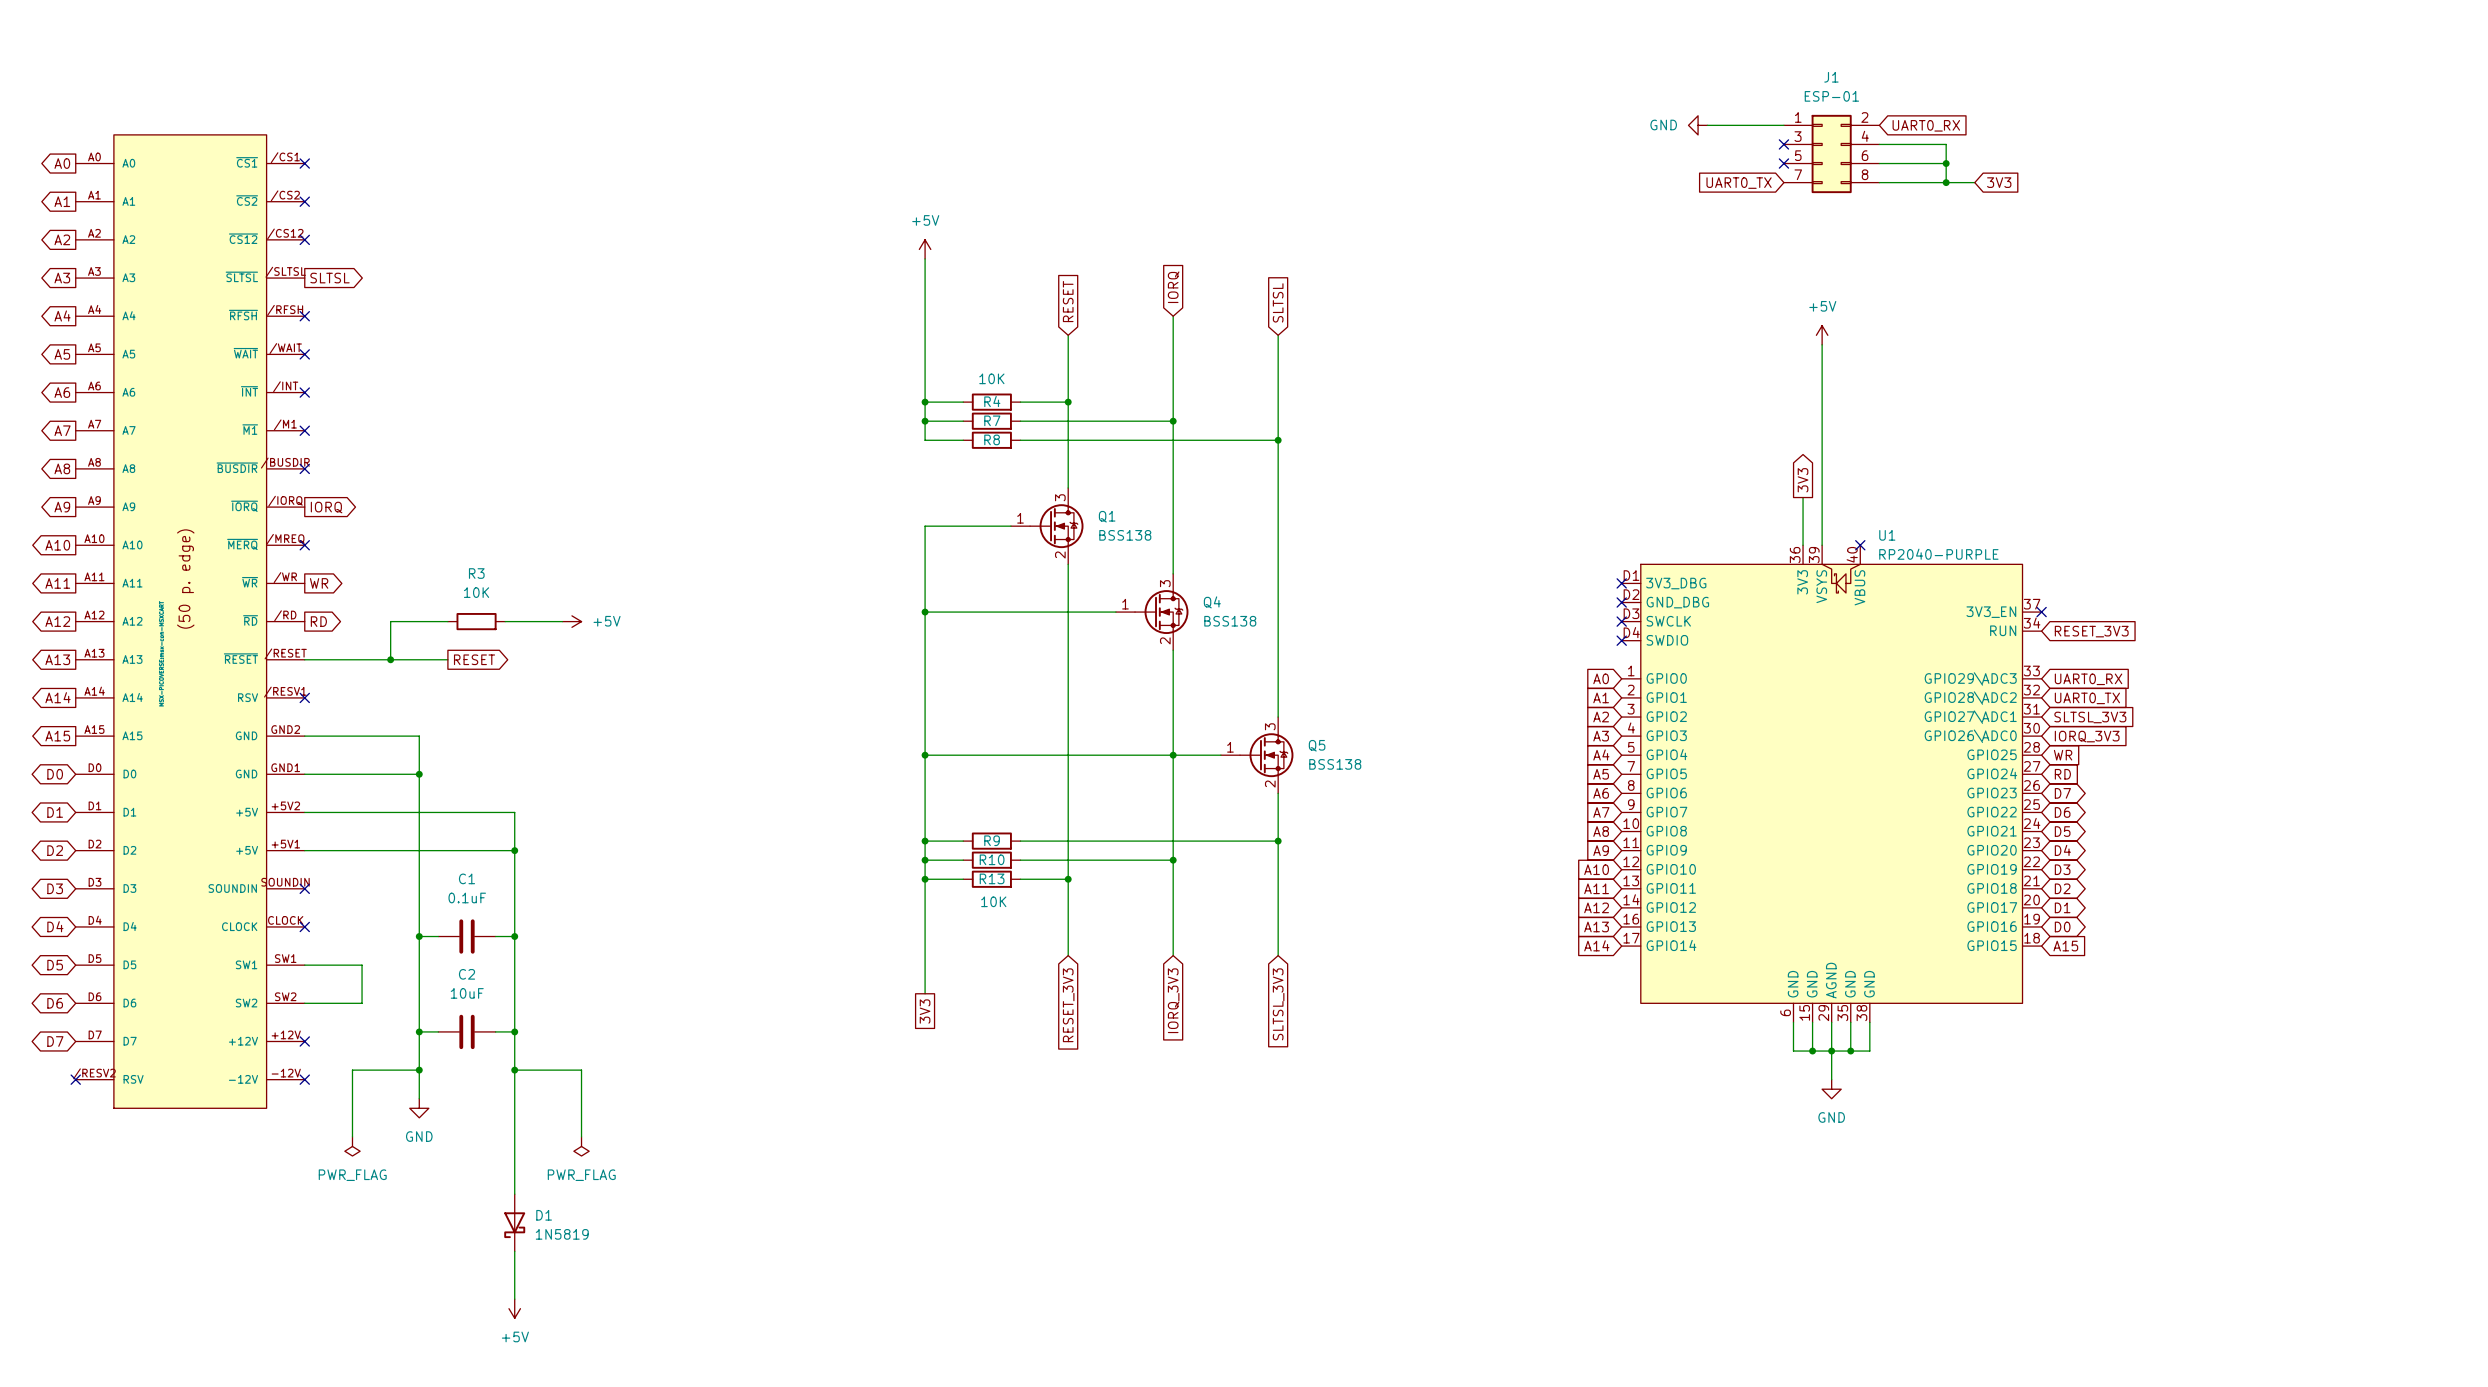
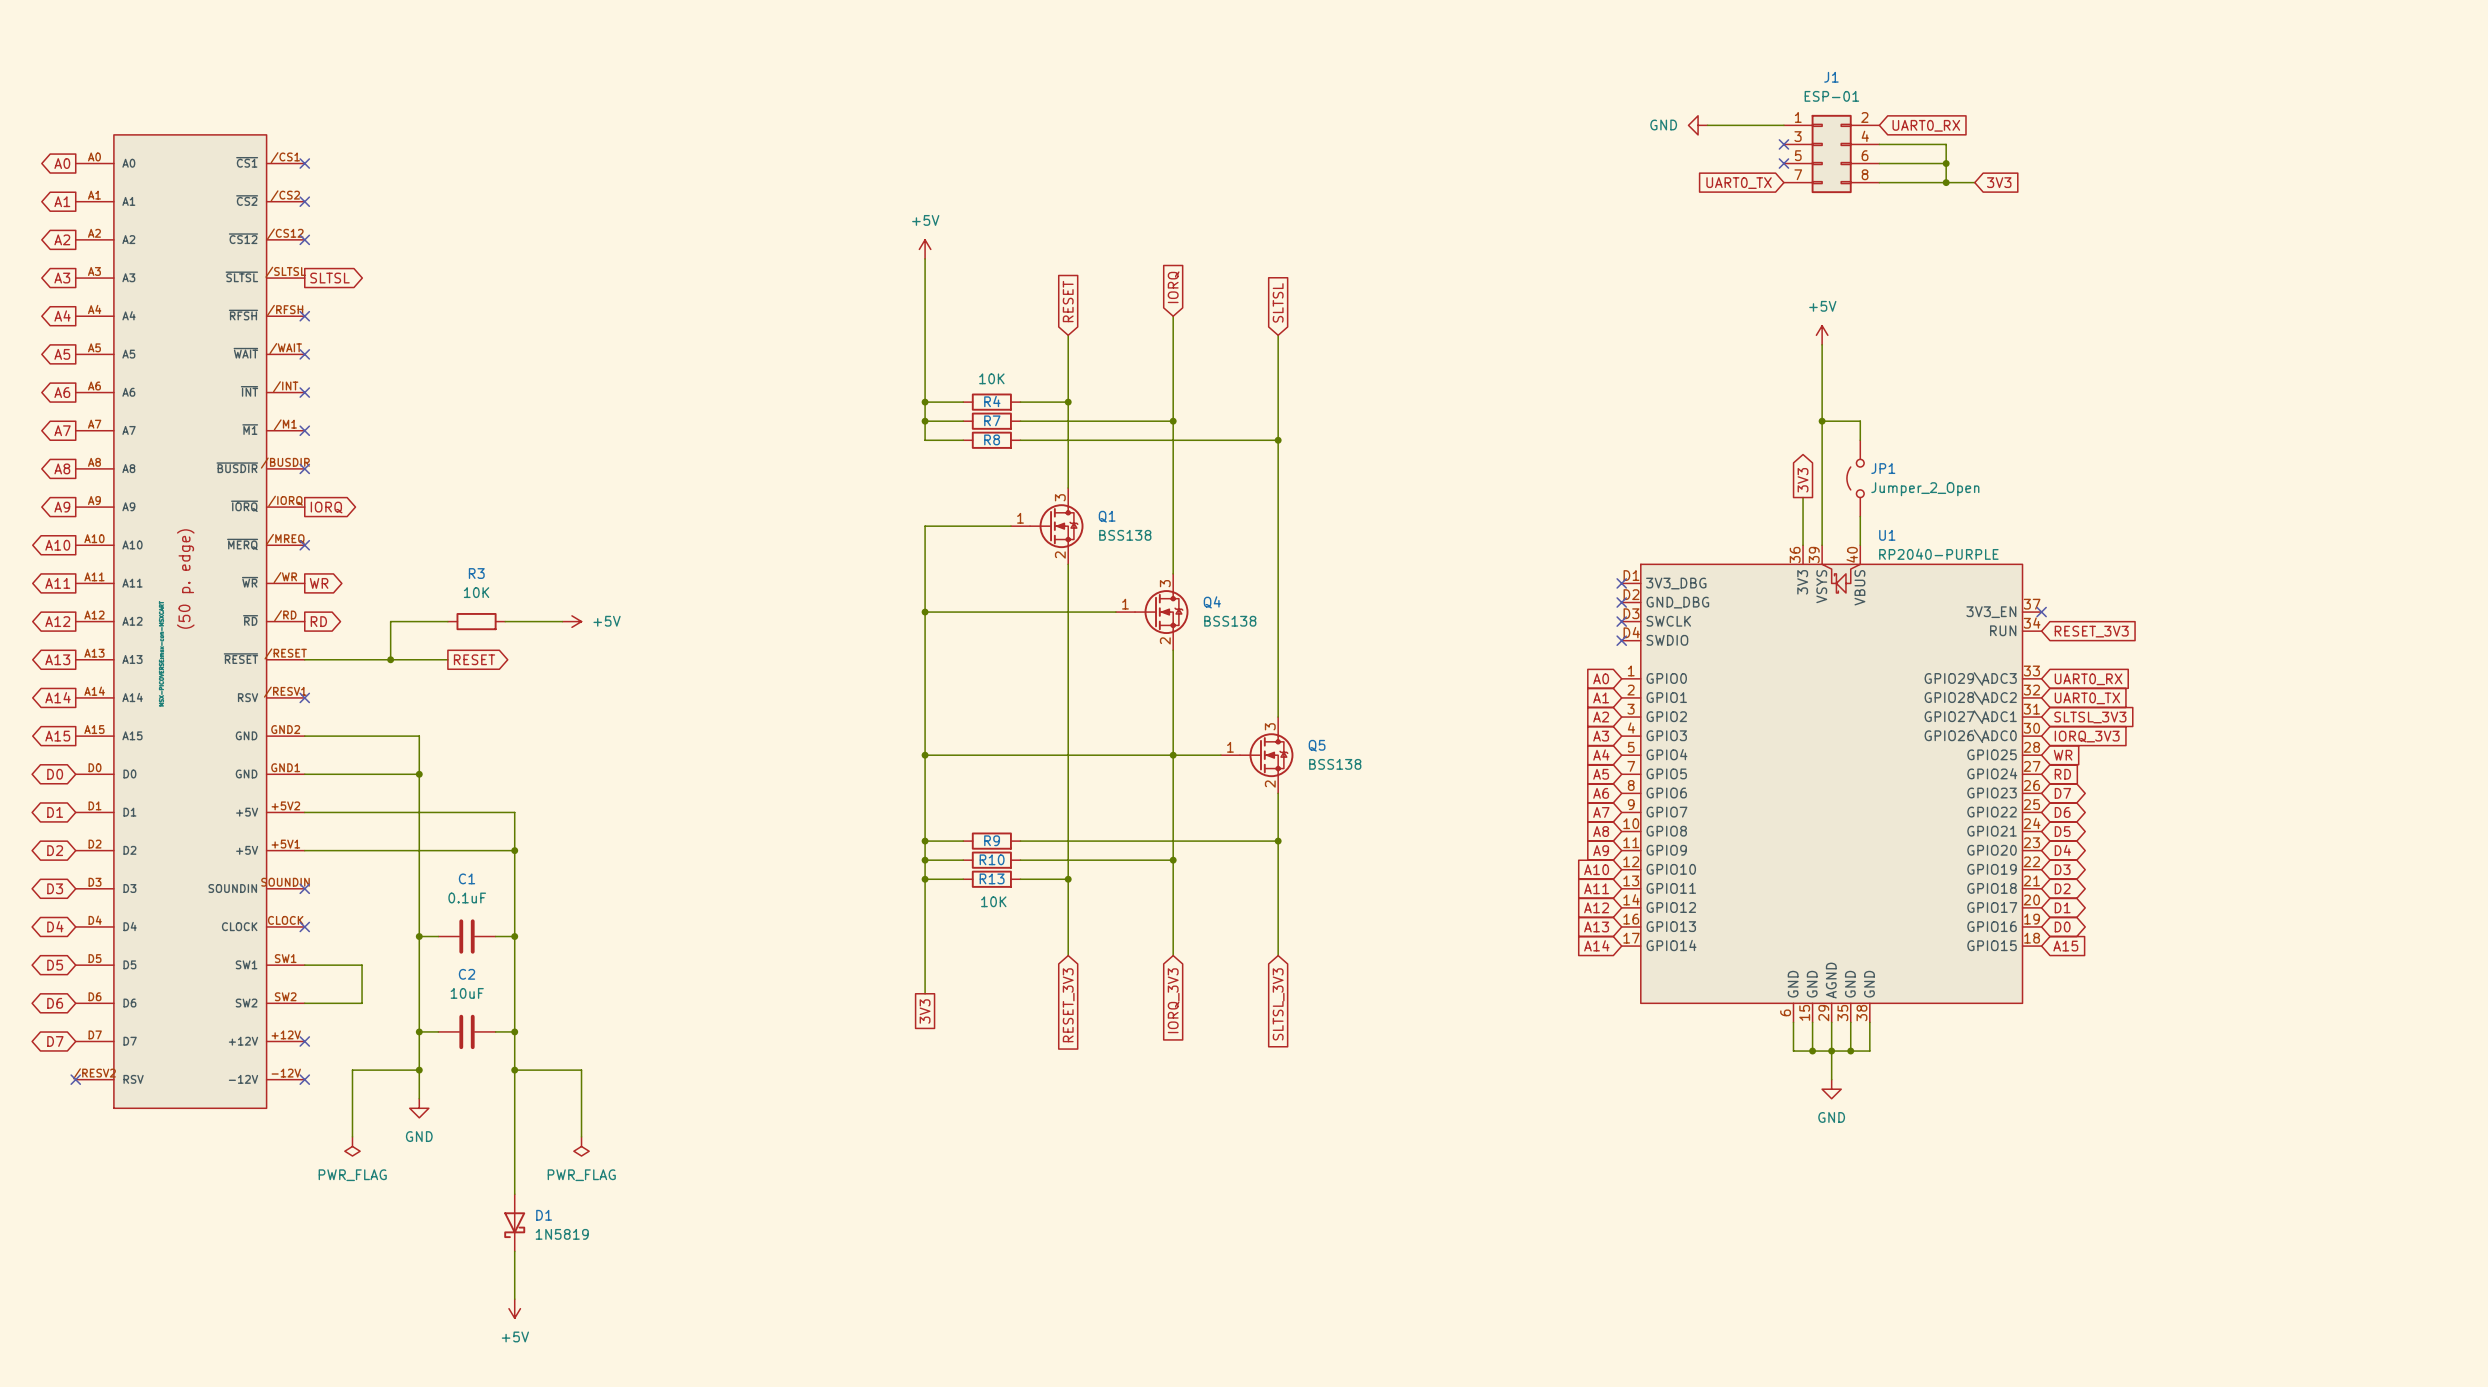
wire: none -> (1822, 421) (1860, 421) (1860, 440)
junction: none -> (1822, 421)
JP1: none -> Jumper_2_Open (1855, 478)
wire: none -> (1860, 516) (1860, 545)
no-connect mark: (1860, 545) -> none

